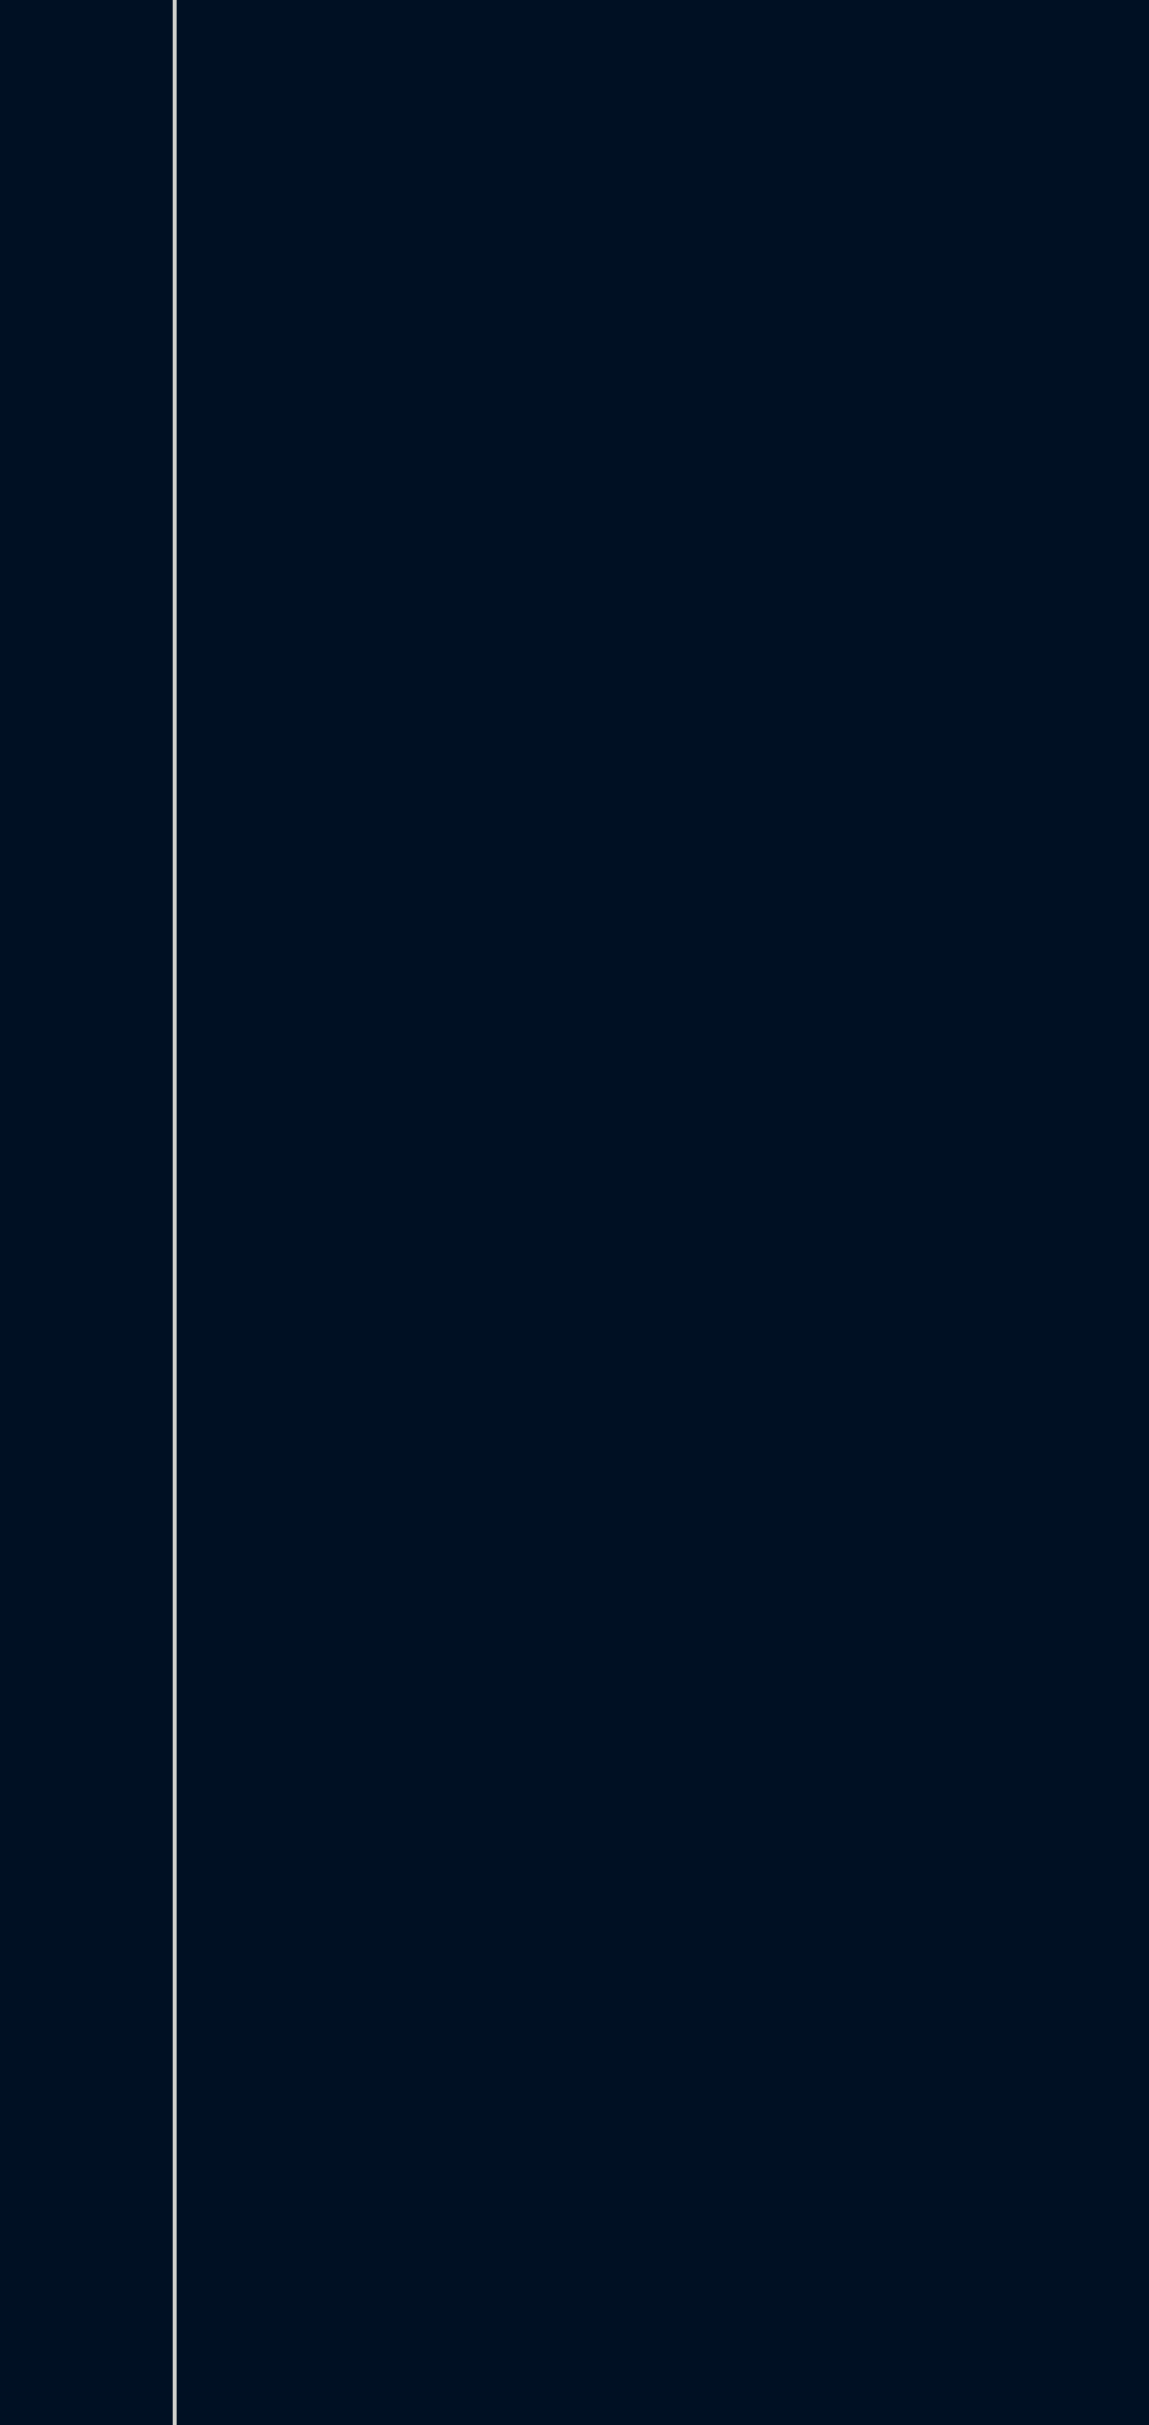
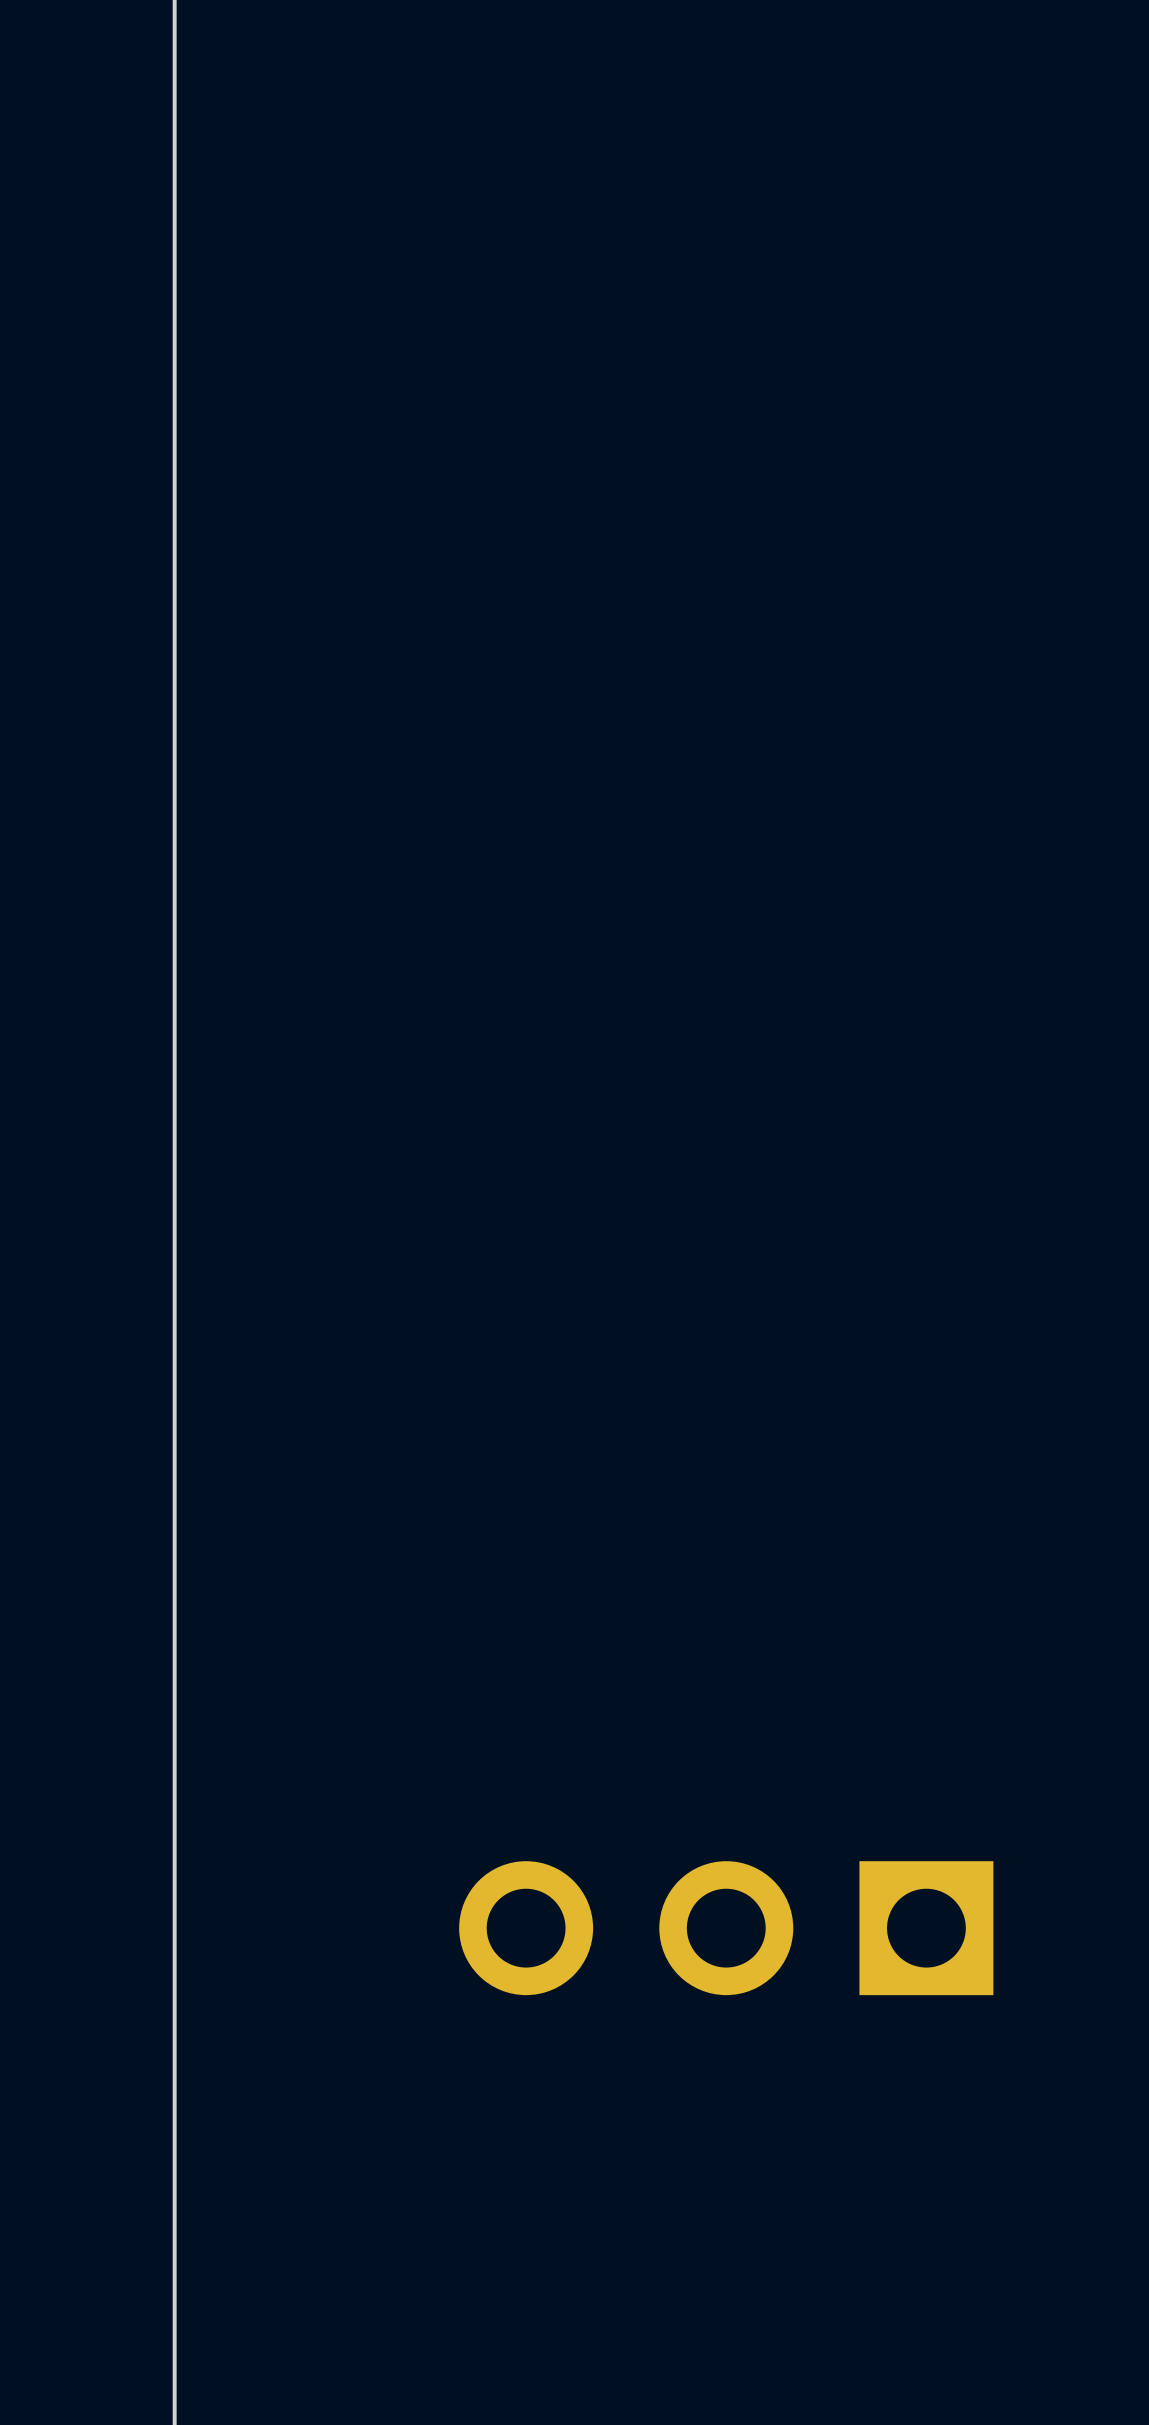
part: none -> (726, 1928)

